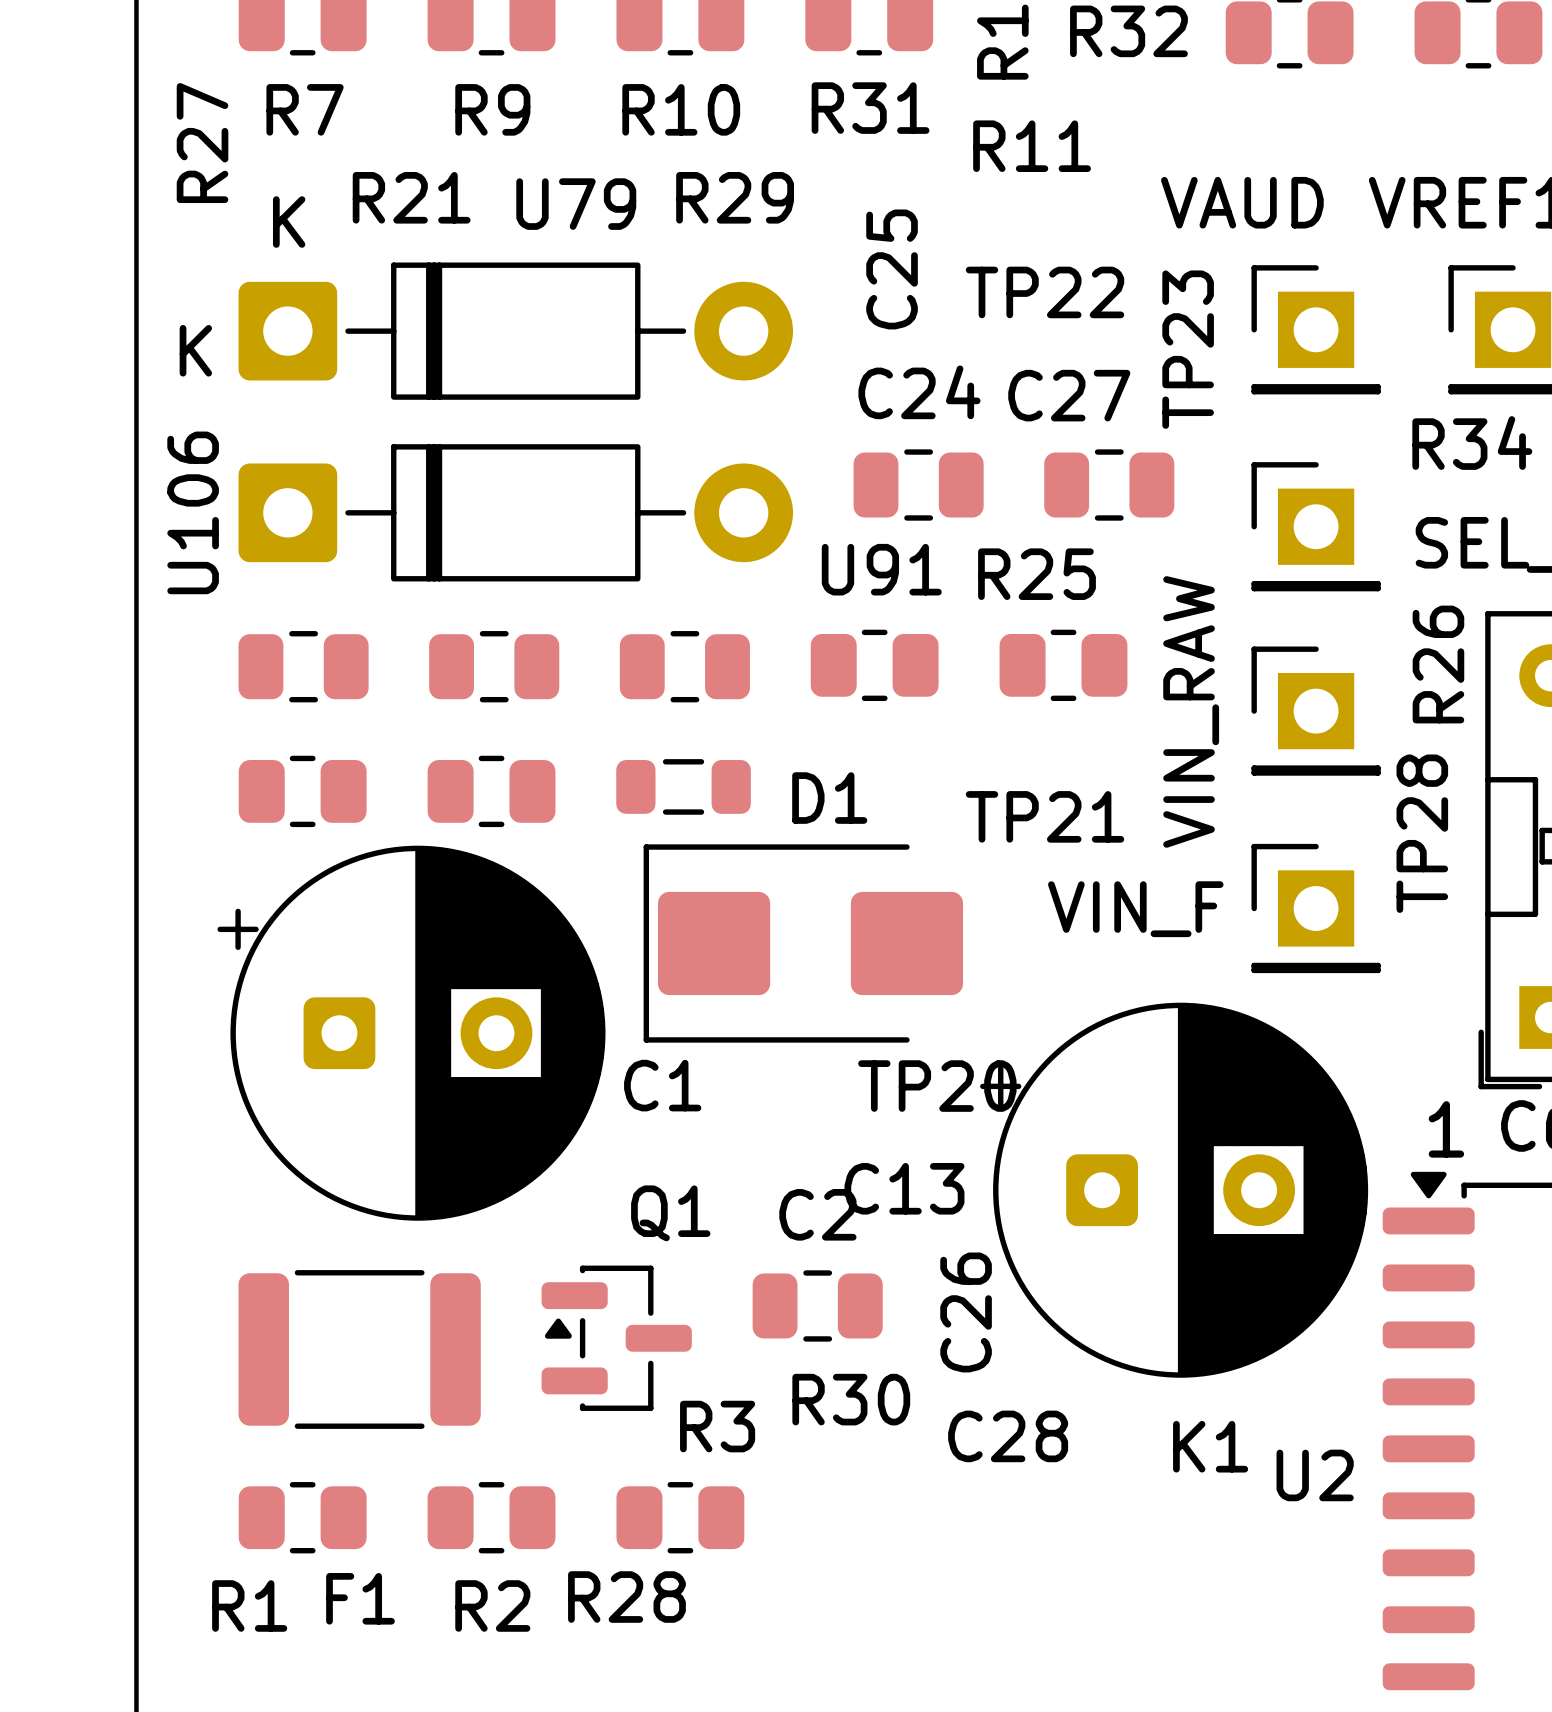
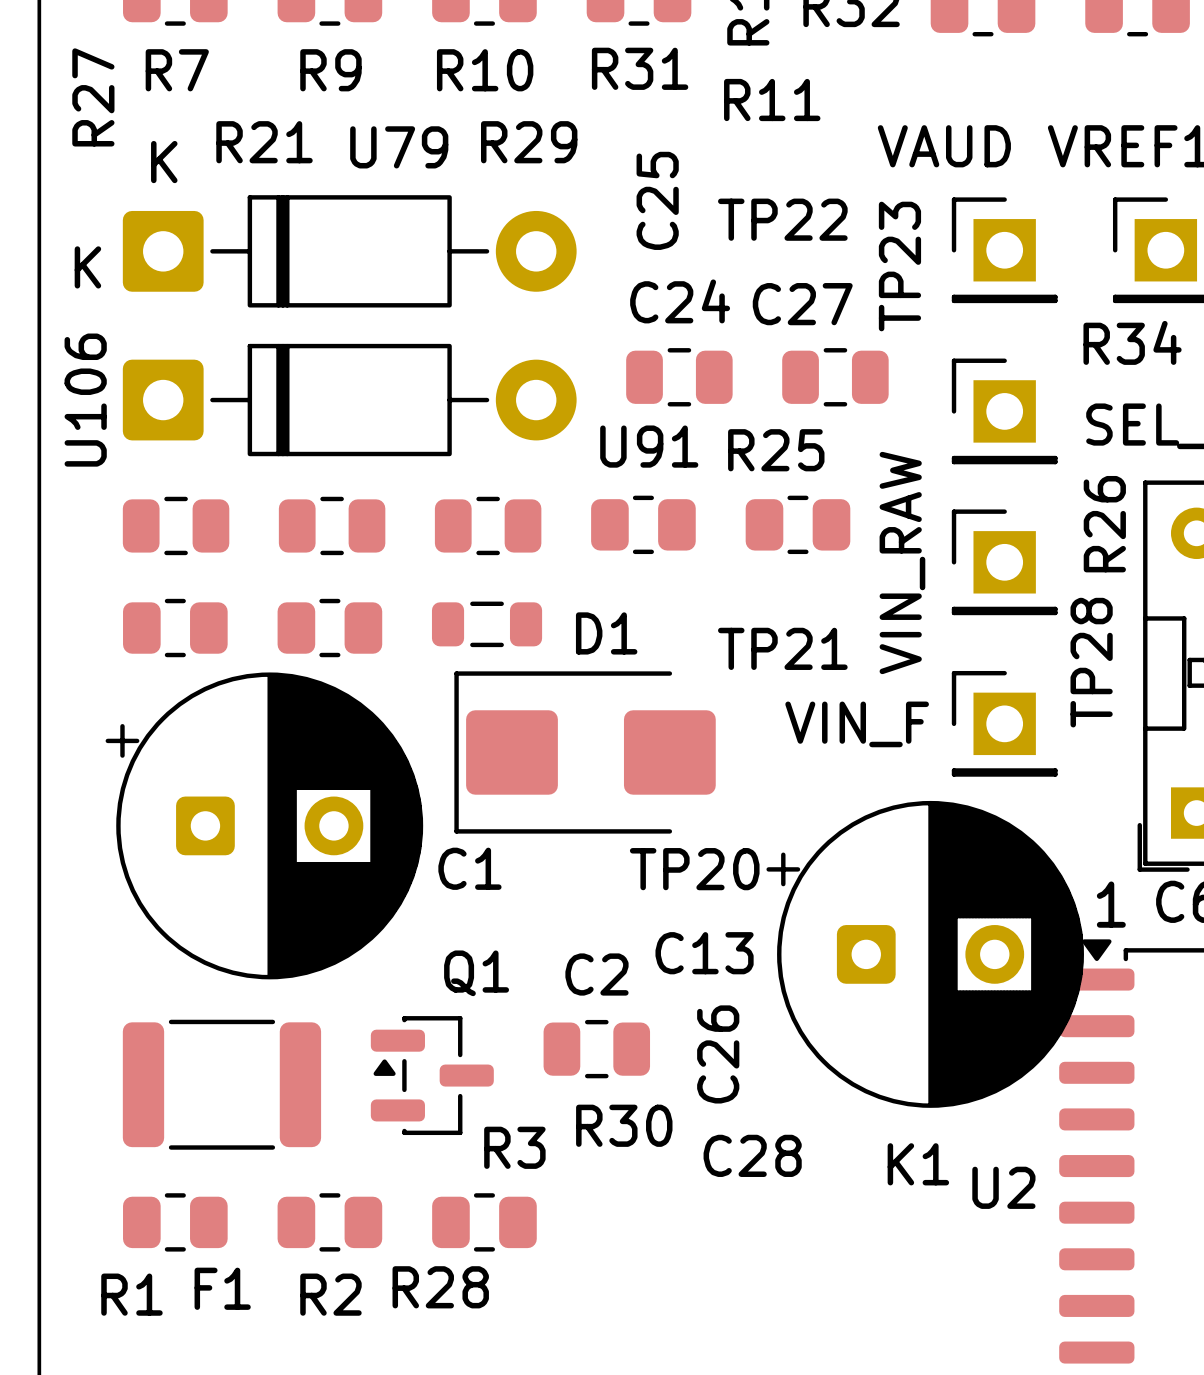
C13 position: (1174, 1190) -> (925, 954)

